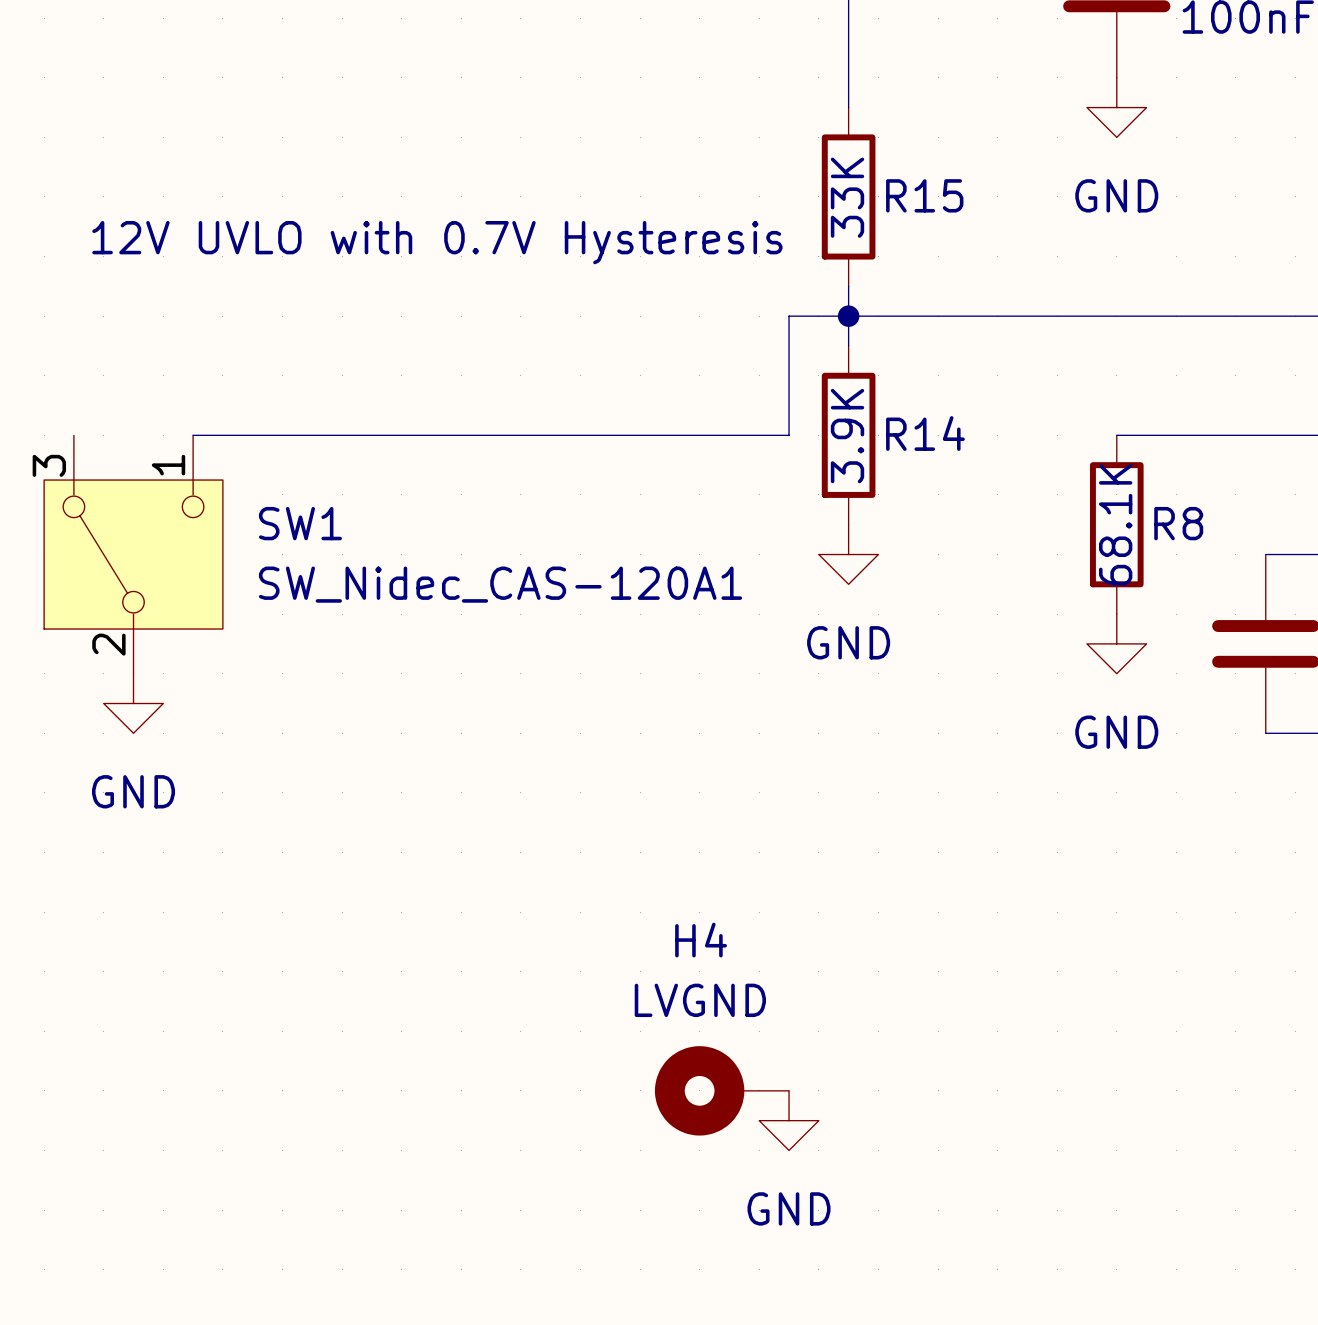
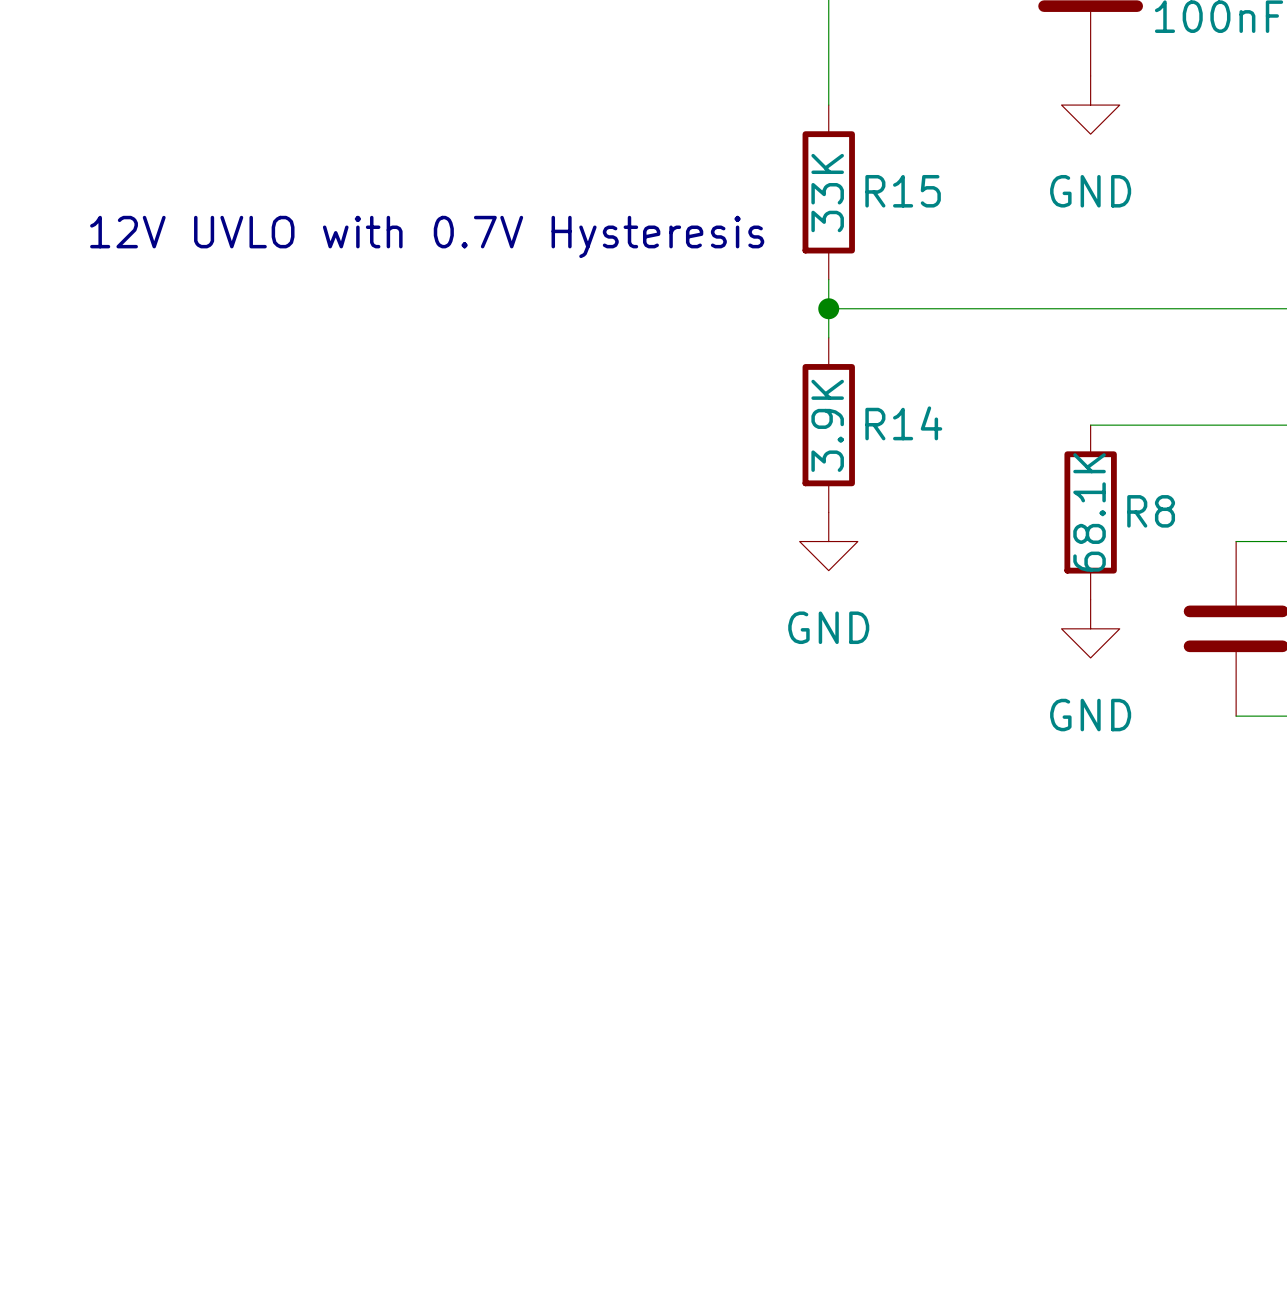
wire: (848, 316) (789, 316) (789, 435) (193, 435) -> none
SW1: SW_Nidec_CAS-120A1 (133, 554) -> none
power symbol: GND (133, 703) -> none
H4: LVGND (721, 1090) -> none
power symbol: GND (789, 1120) -> none

